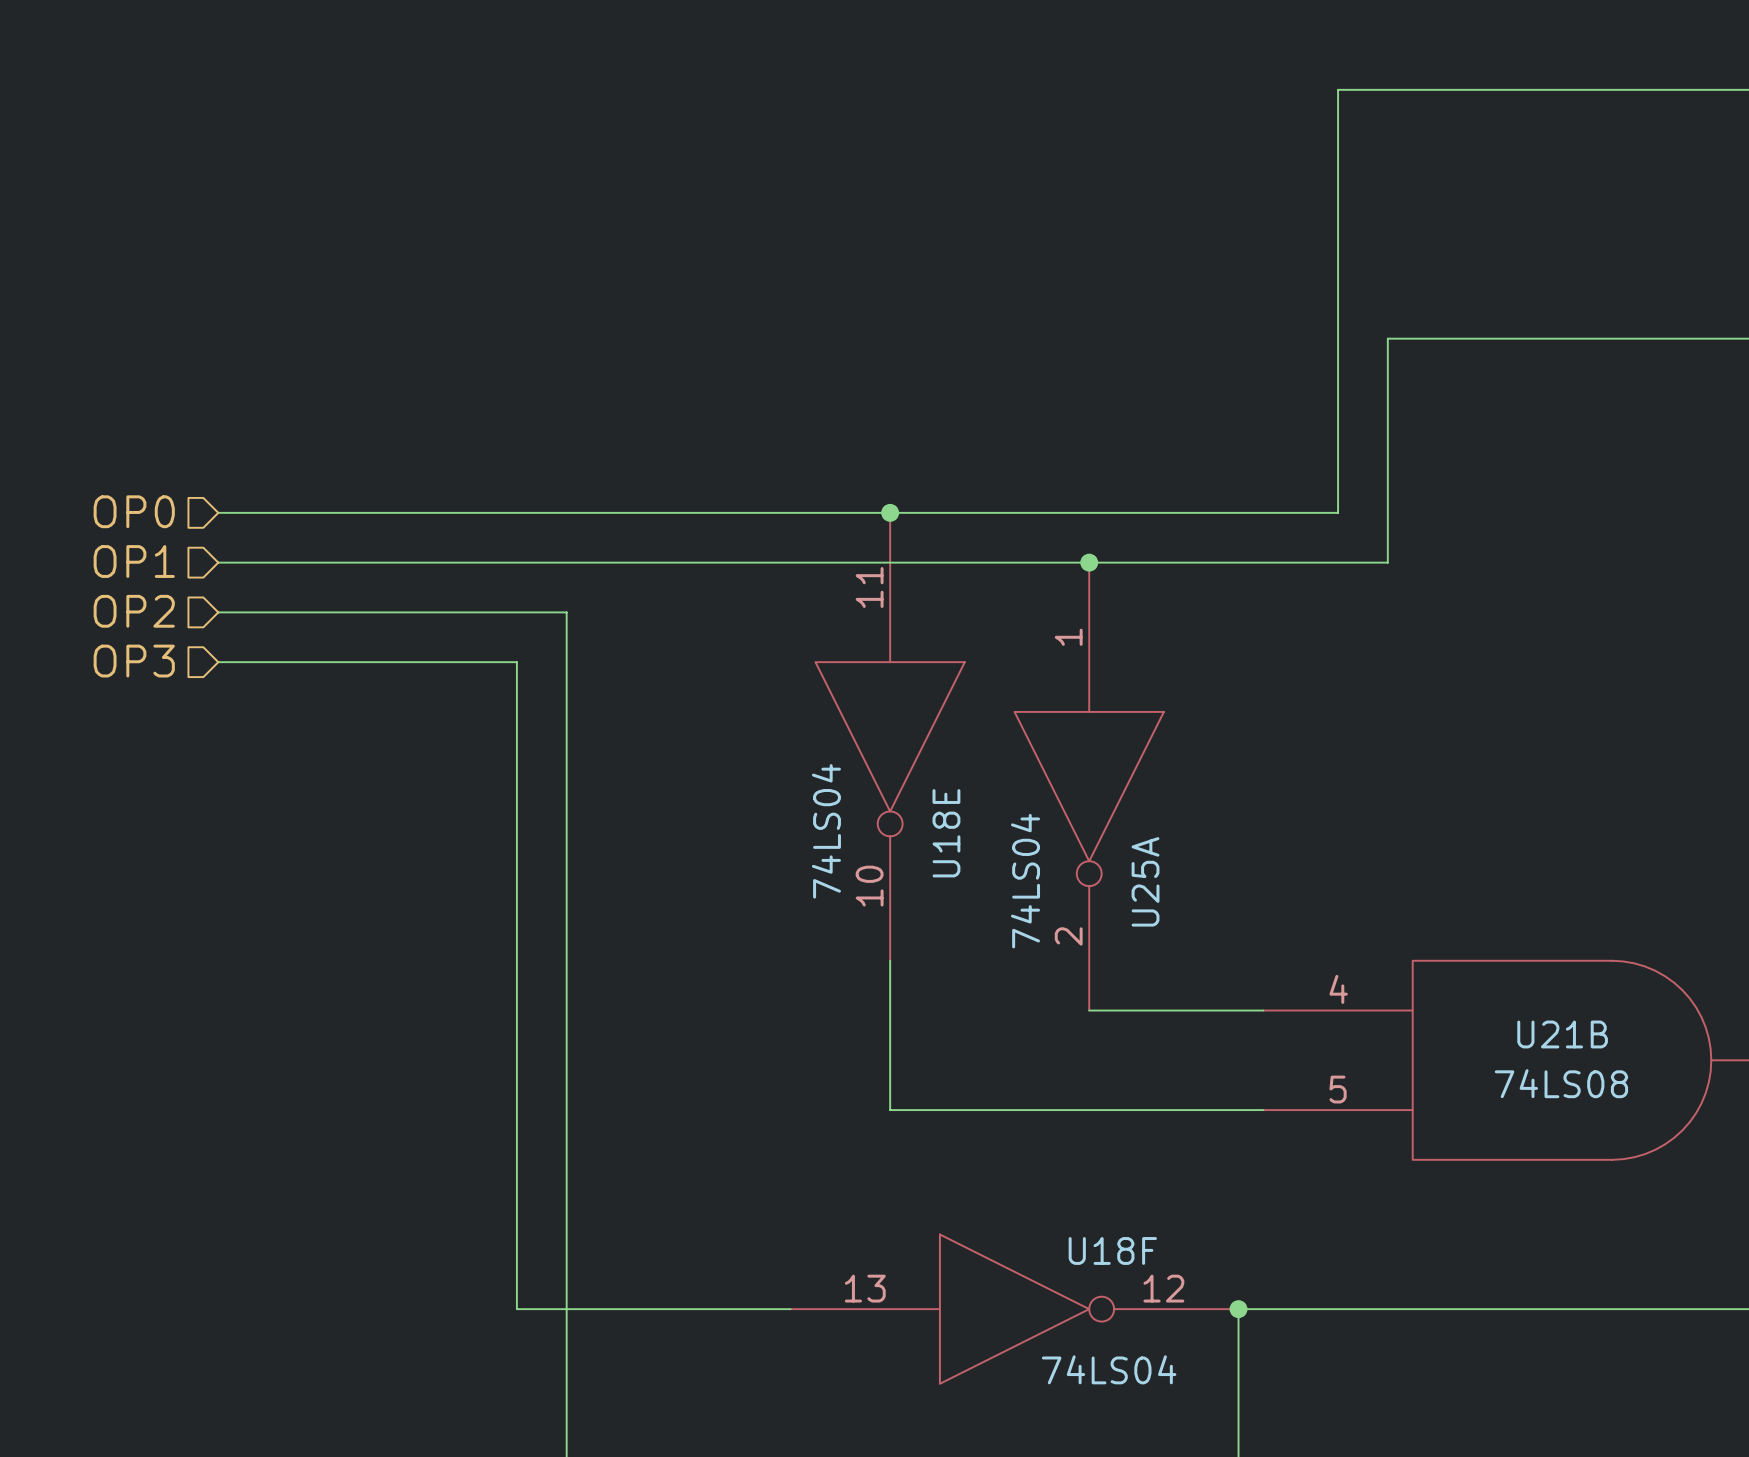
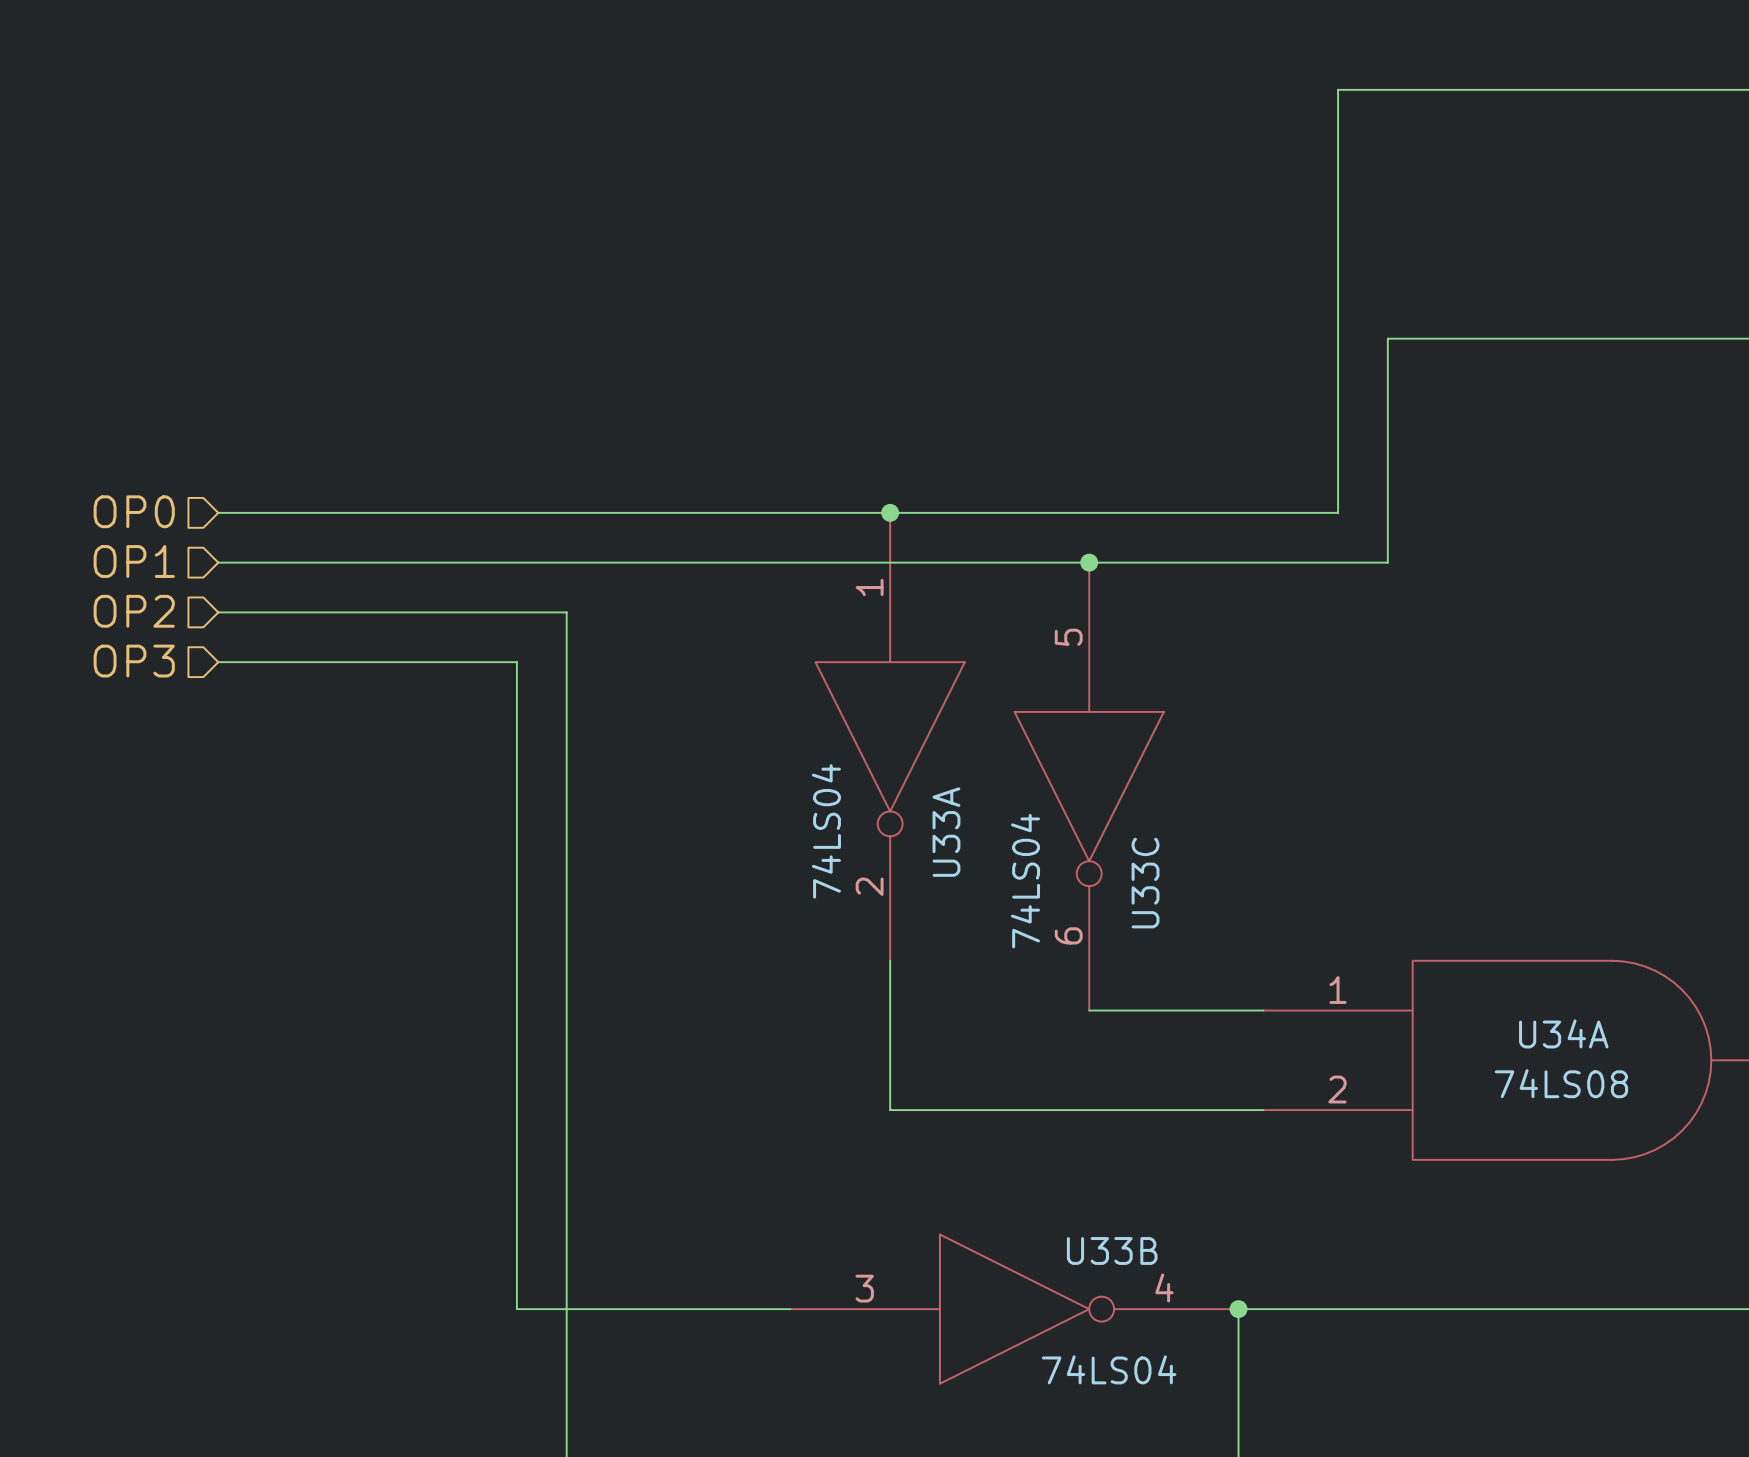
U18E pin number: 11 (869, 587) -> 1 (869, 587)
U25A pin number: 1 (1068, 637) -> 5 (1068, 637)
U18E name: U18E (946, 833) -> U33A (946, 832)
U25A name: U25A (1145, 881) -> U33C (1145, 883)
U18E pin number: 10 (869, 886) -> 2 (869, 886)
U25A pin number: 2 (1068, 936) -> 6 (1068, 935)
U21B pin number: 4 (1338, 989) -> 1 (1338, 990)
U21B name: U21B (1562, 1034) -> U34A (1563, 1033)
U21B pin number: 5 (1338, 1089) -> 2 (1337, 1089)
U18F name: U18F (1112, 1250) -> U33B (1112, 1250)
U18F pin number: 13 (865, 1288) -> 3 (864, 1288)
U18F pin number: 12 (1163, 1288) -> 4 (1164, 1288)

